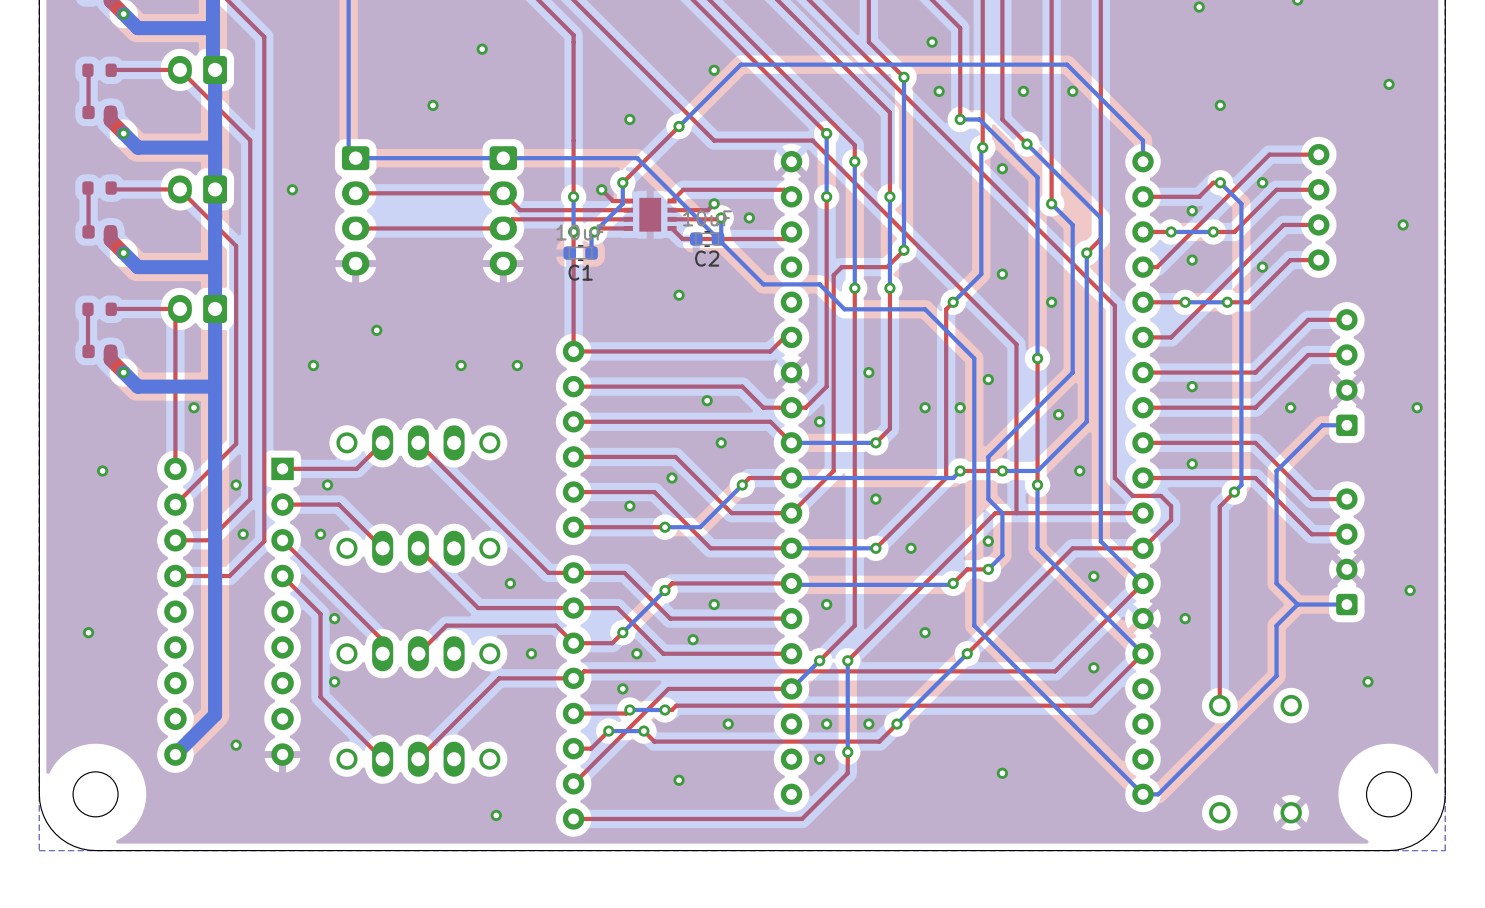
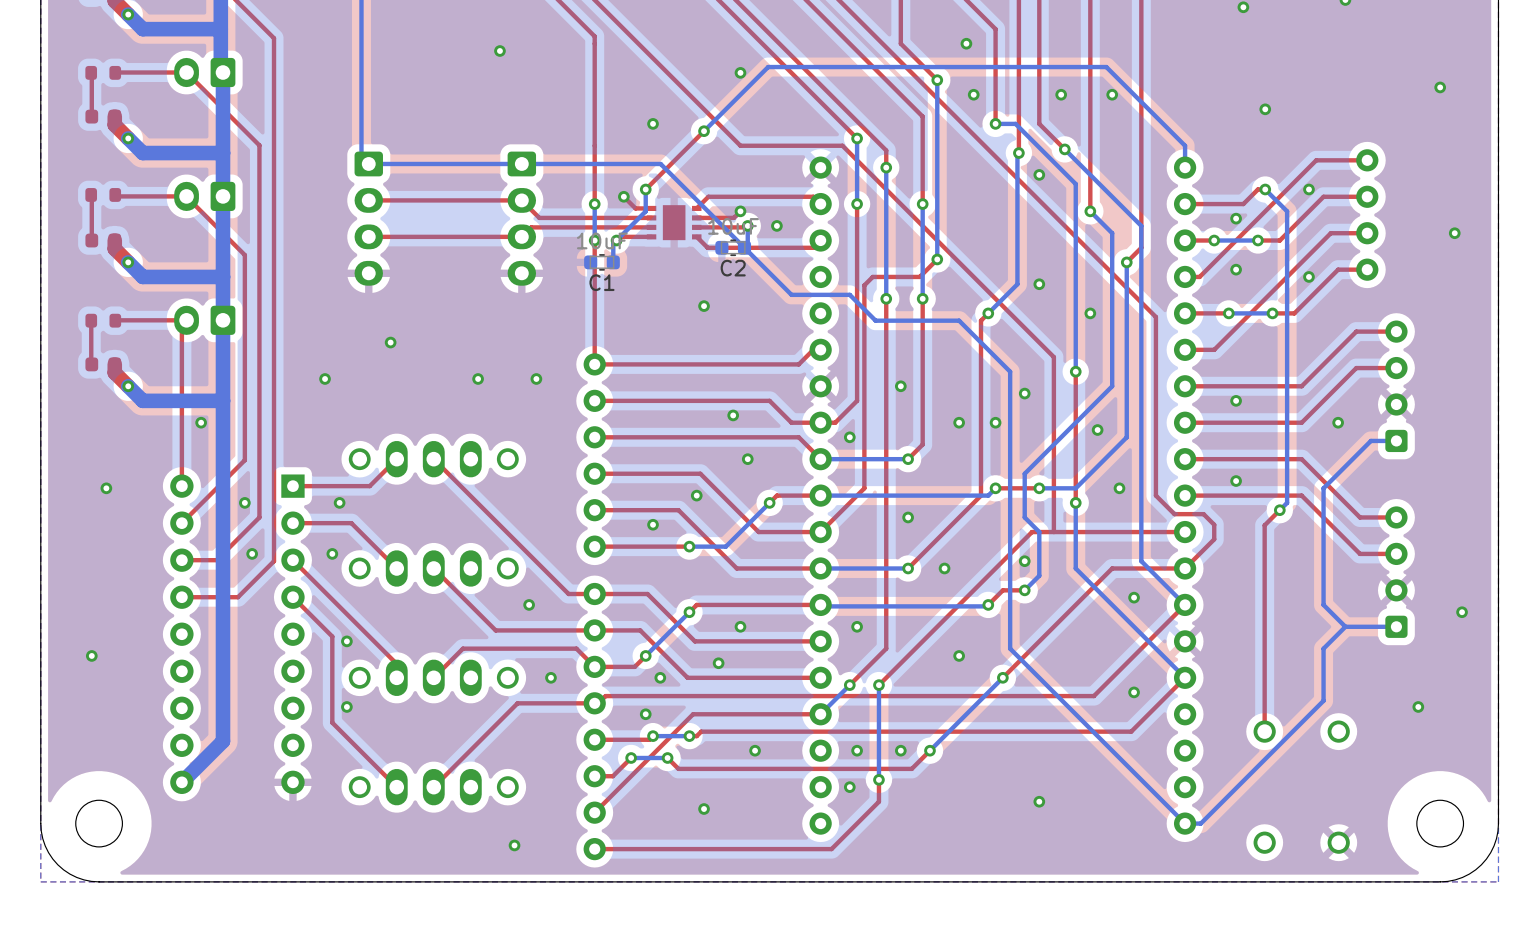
via: (433, 105) -> none
via: (292, 189) -> none
via: (1417, 407) -> none
via: (1185, 618) -> none
via: (236, 745) -> none

